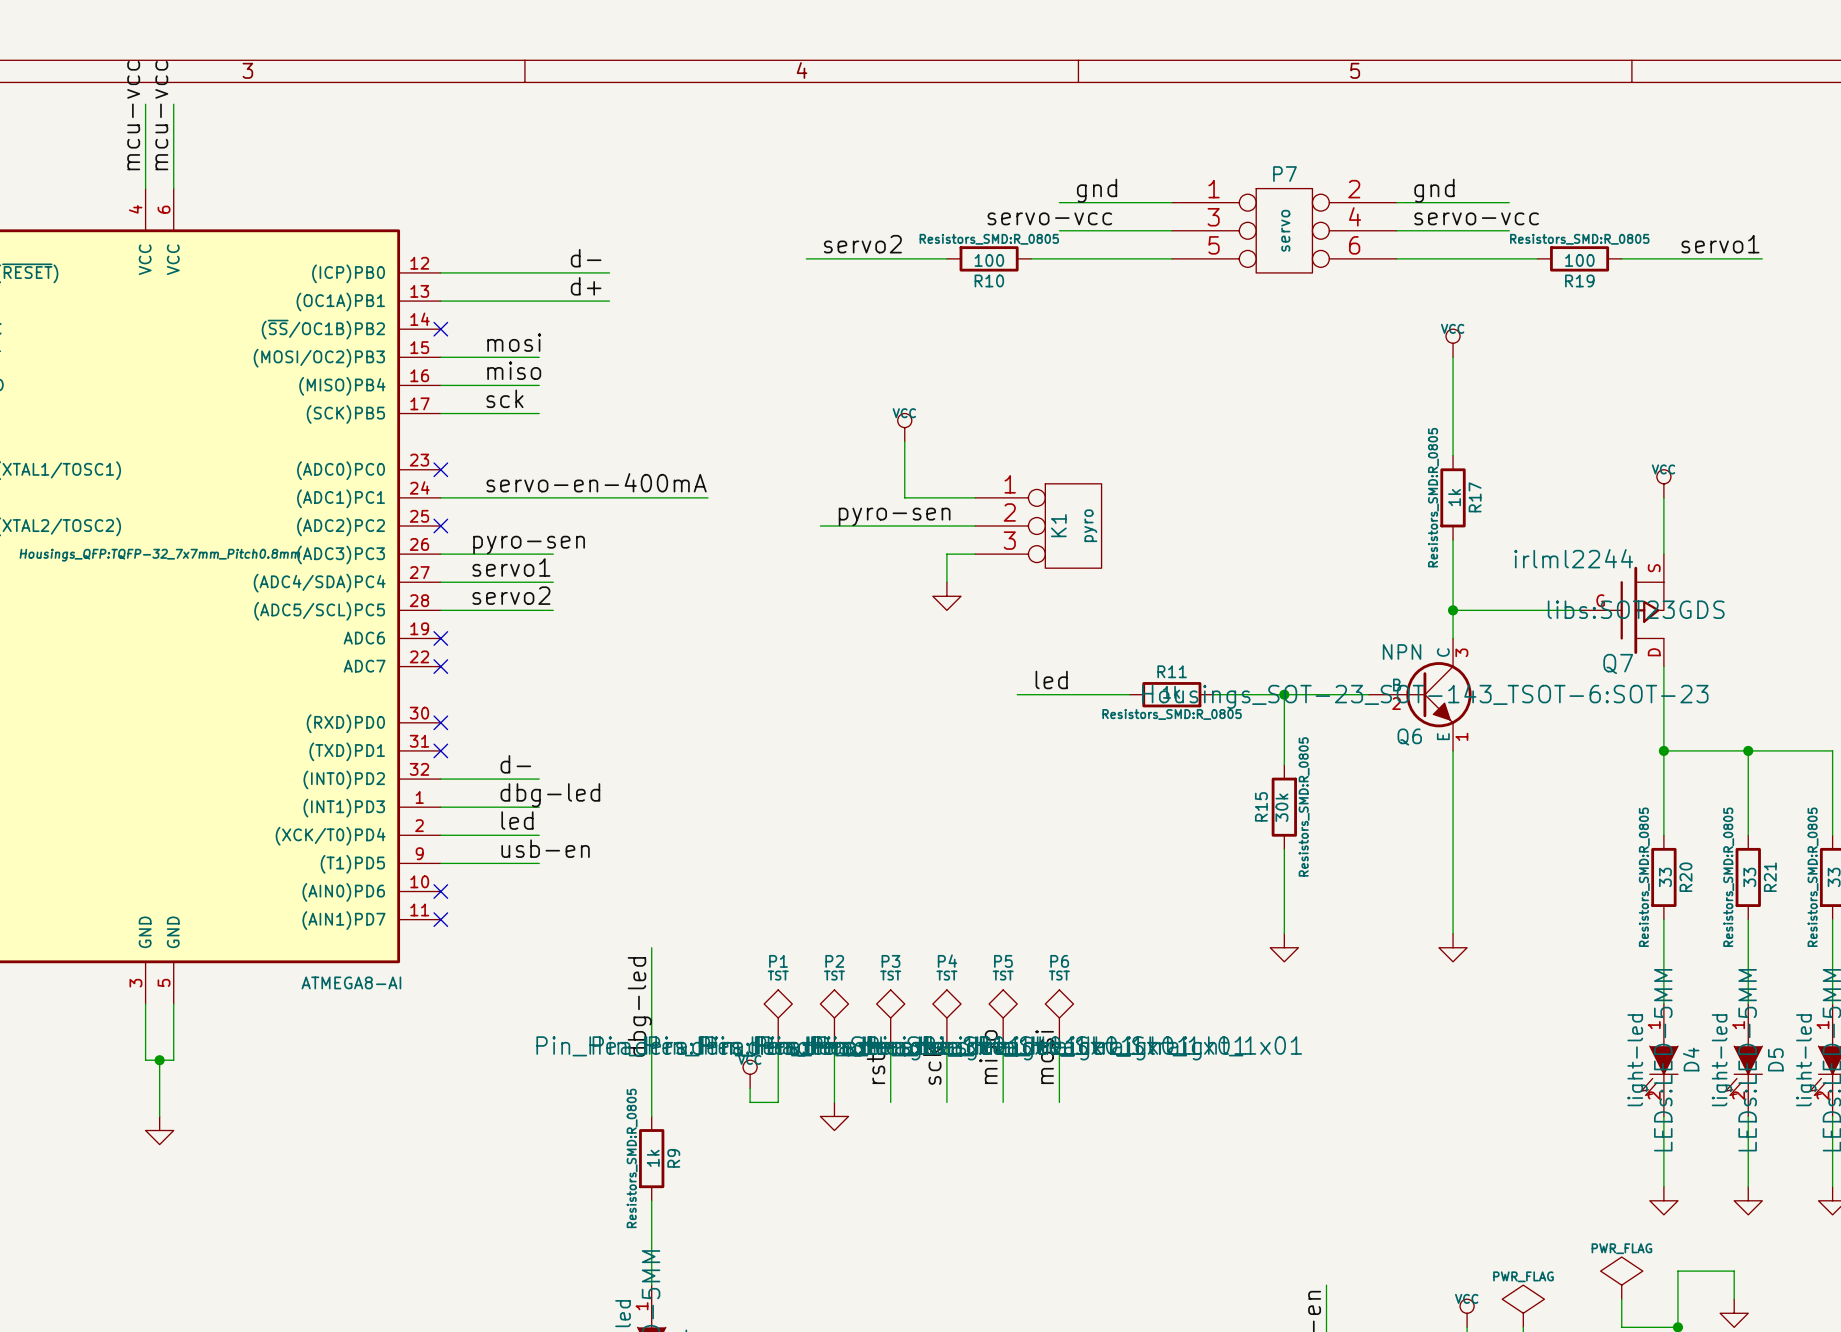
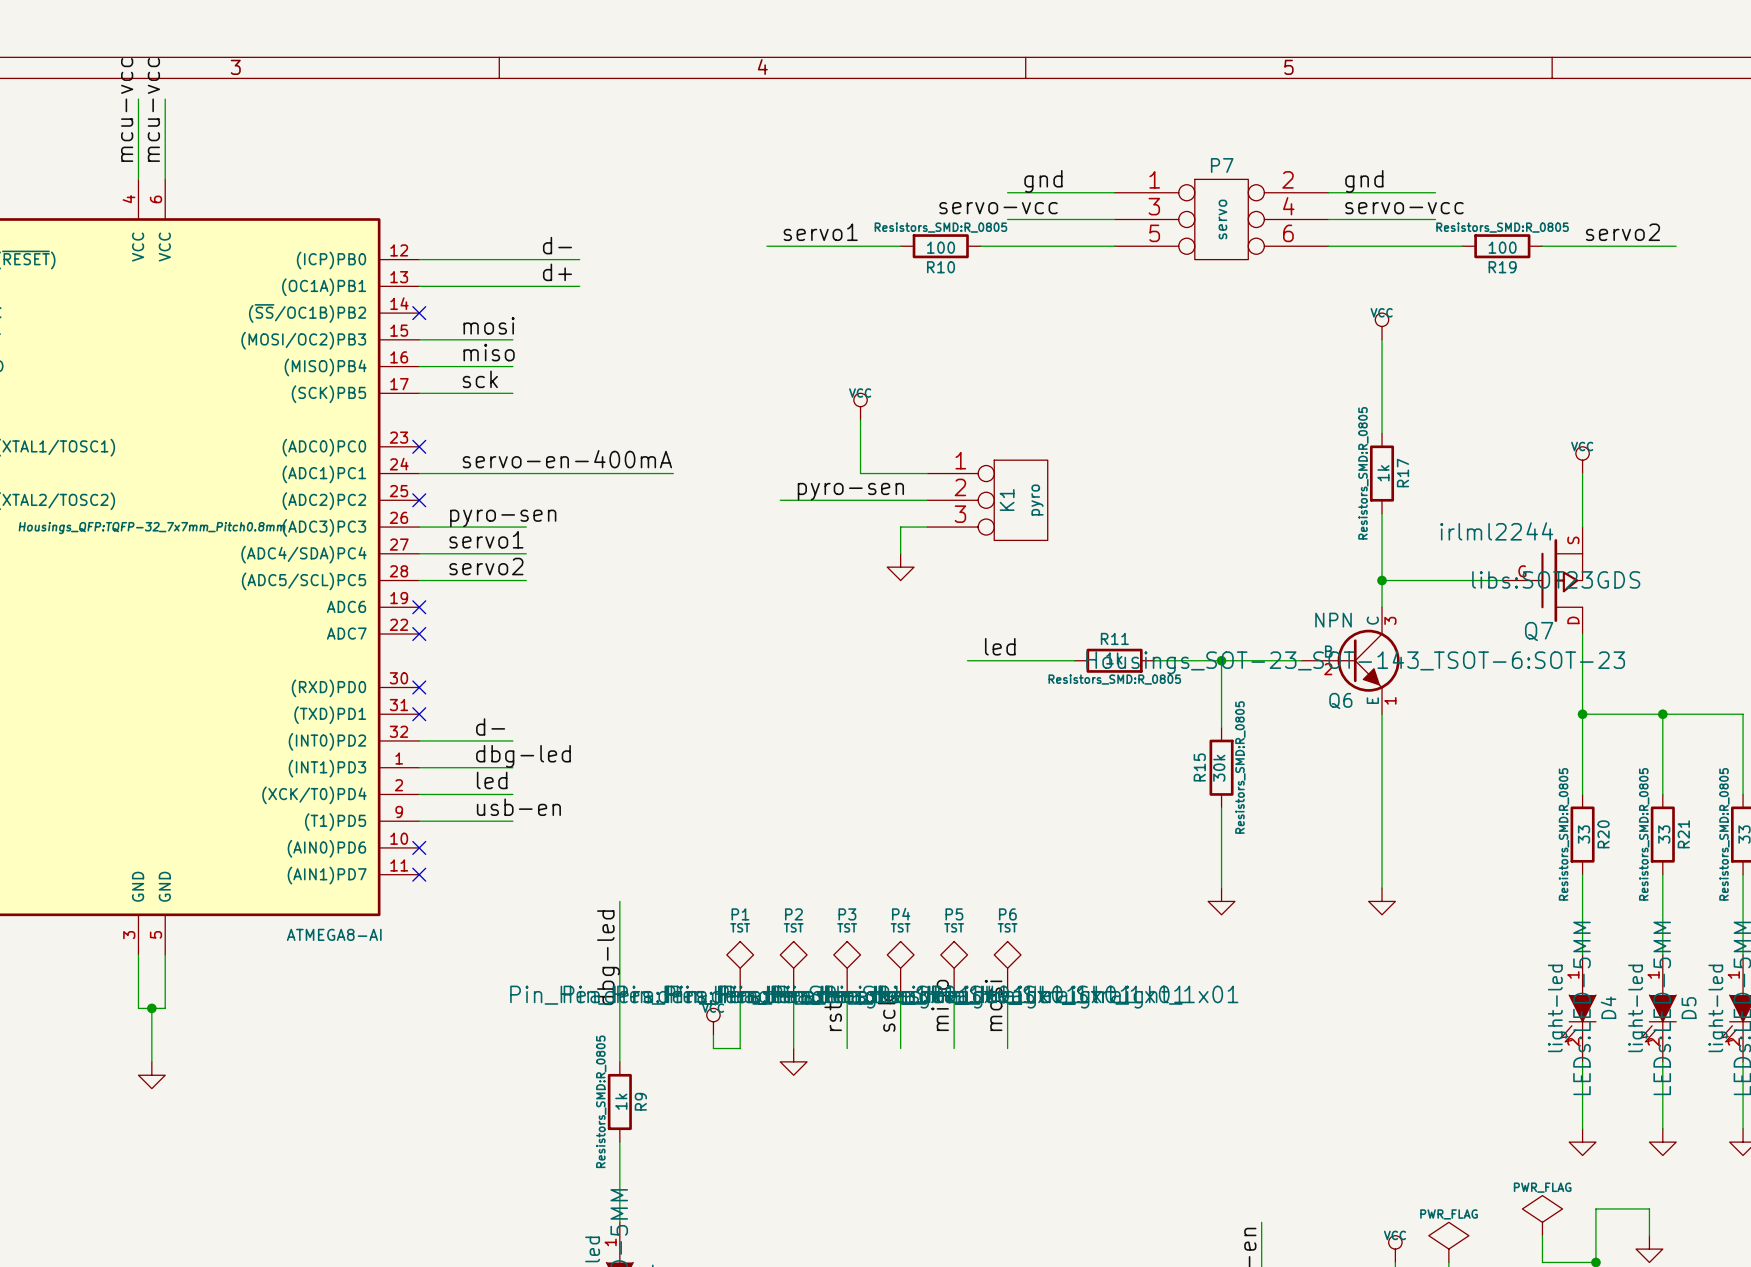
label: servo2 (862, 244) -> servo1 (820, 232)
label: servo1 (1720, 244) -> servo2 (1622, 232)

